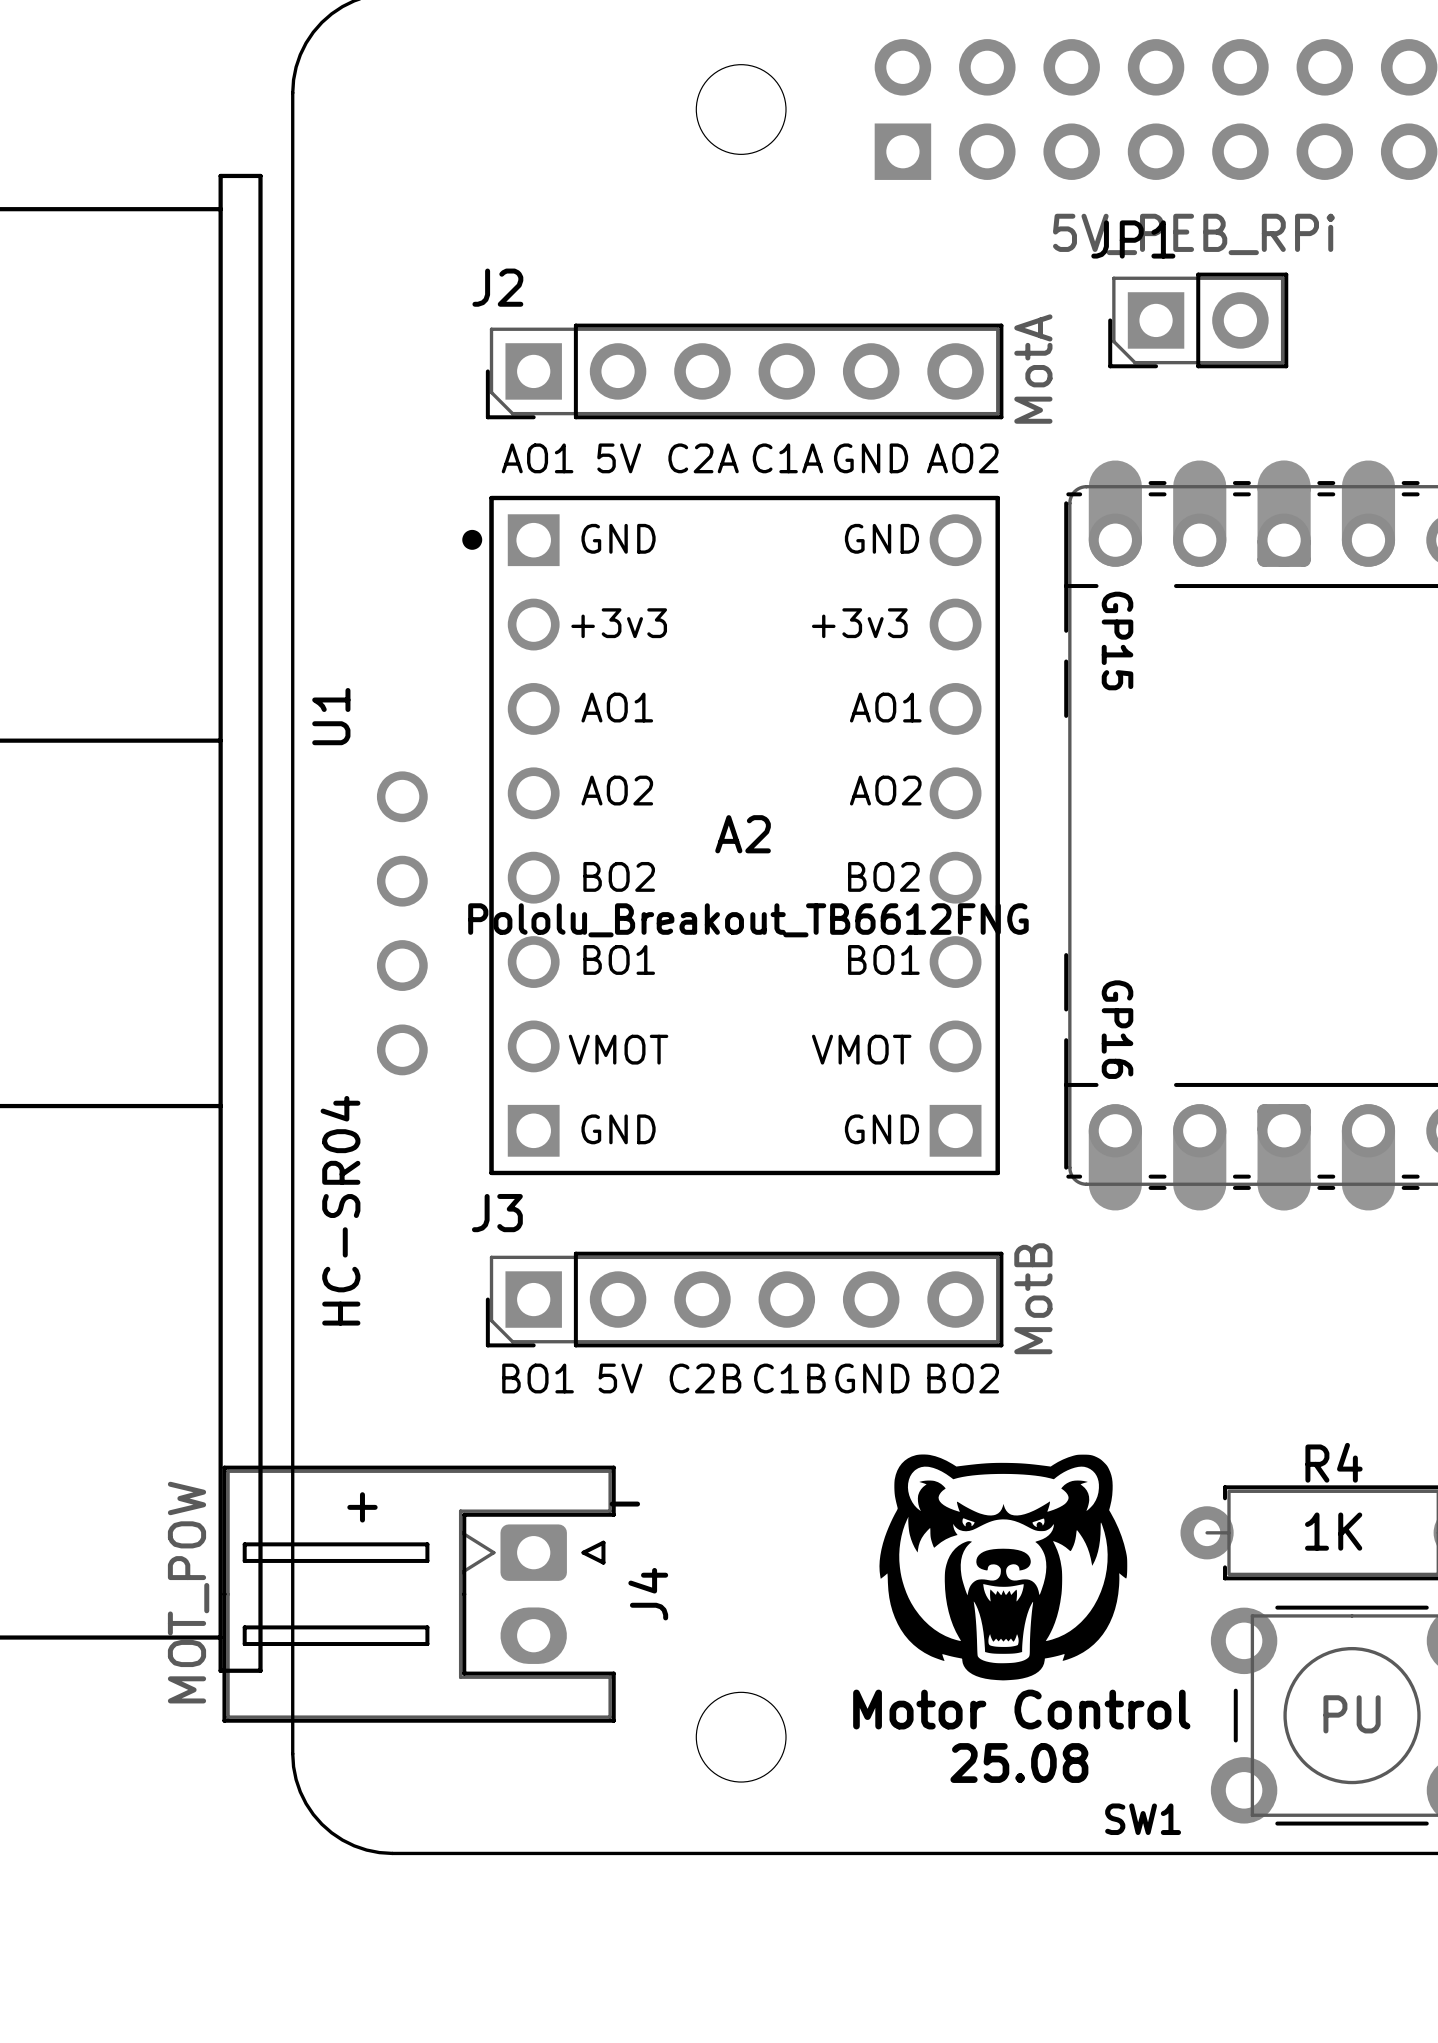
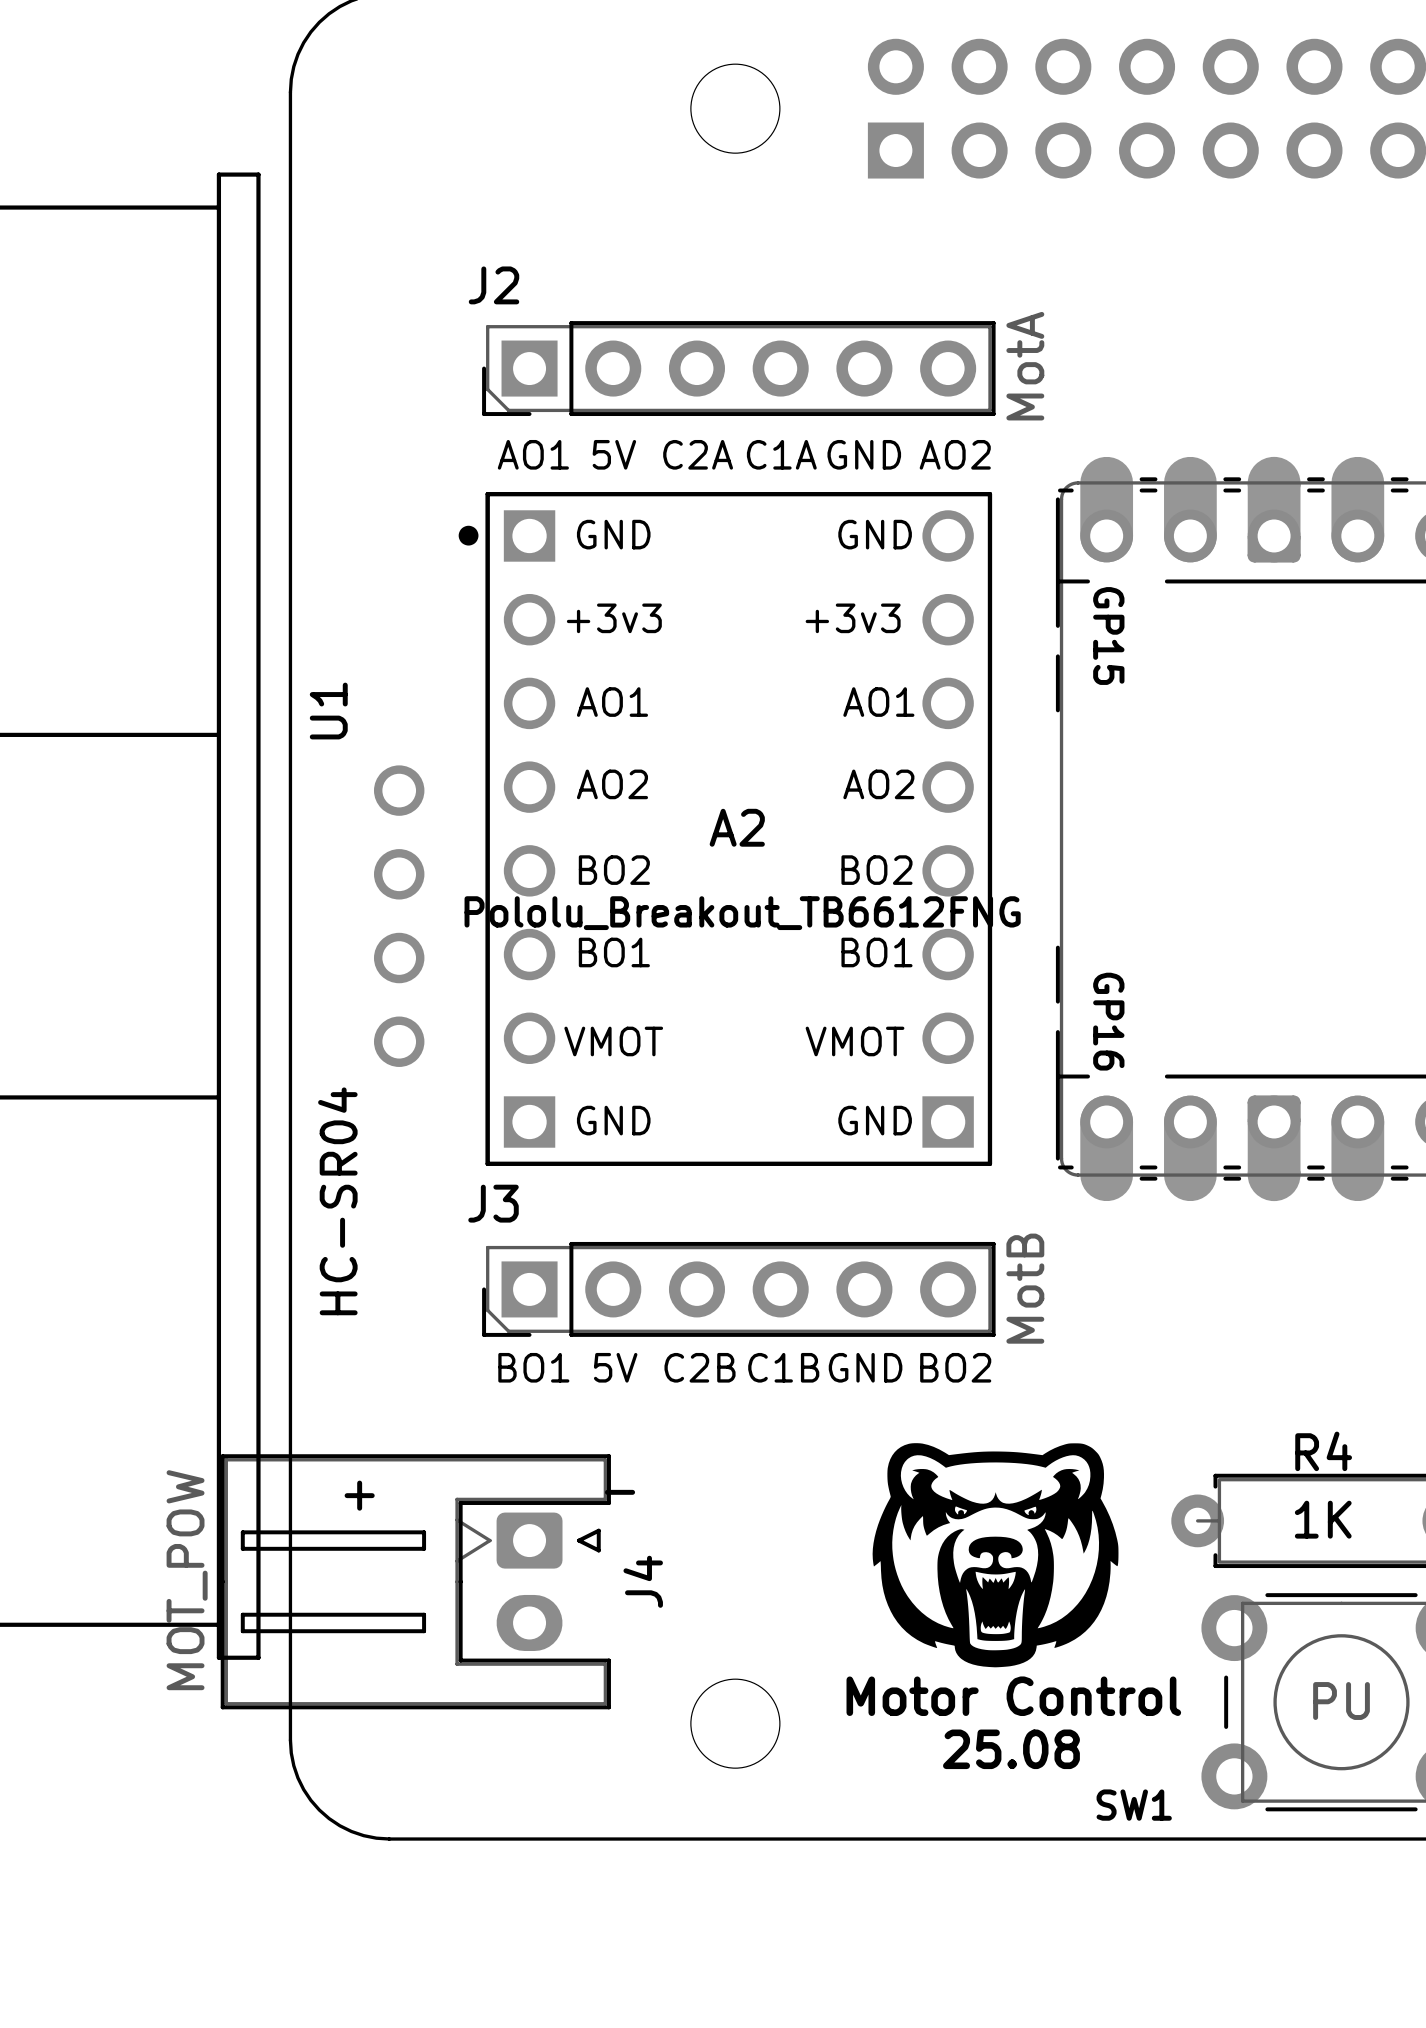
JP1: 5V_PEB_RPi (1198, 320) -> none

